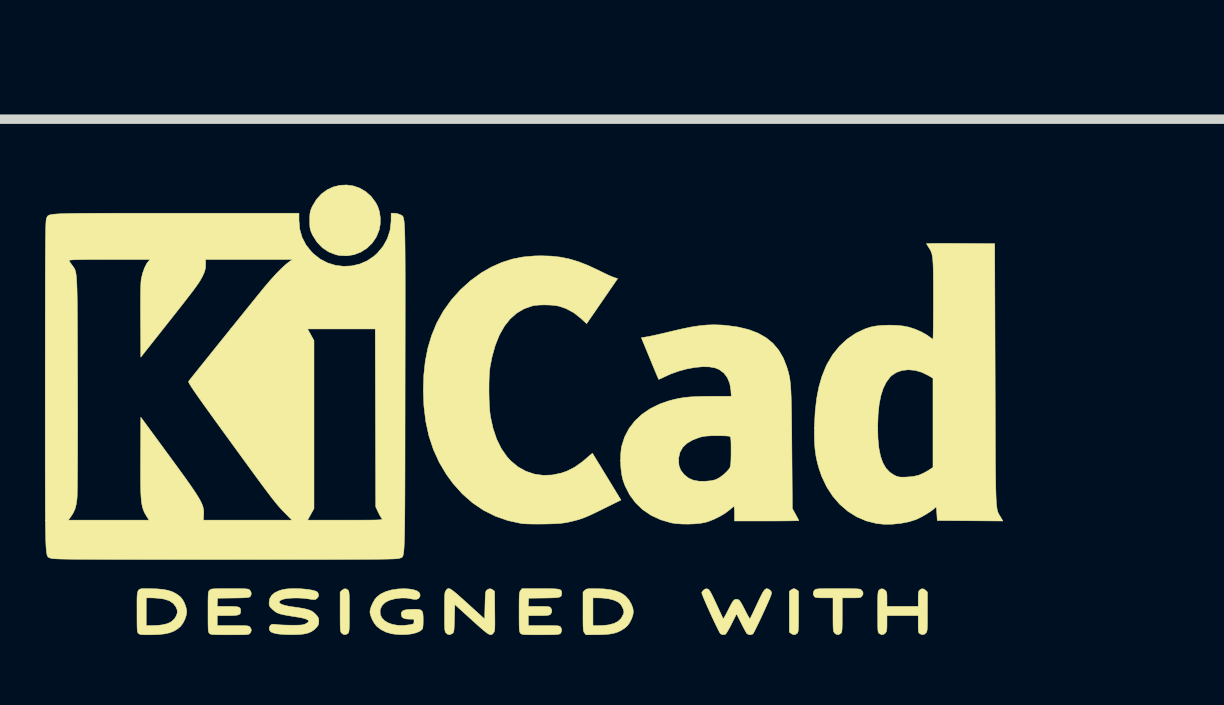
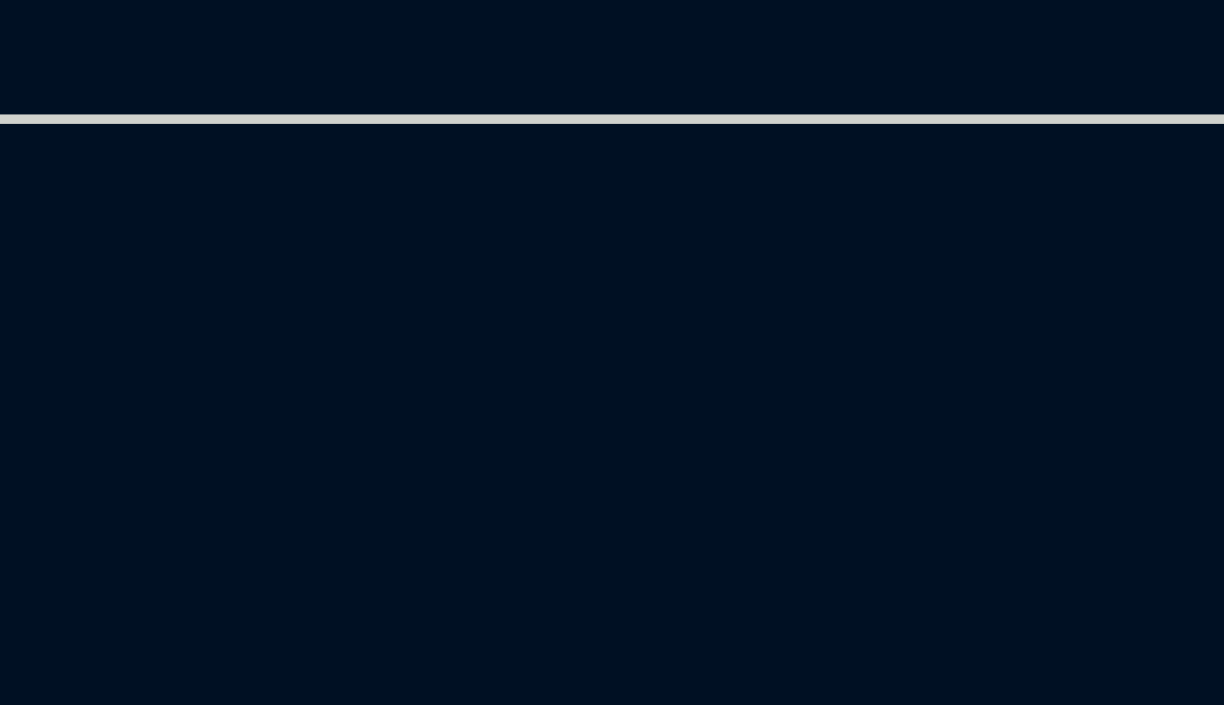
drawing: [44, 184, 1004, 636] -> none

